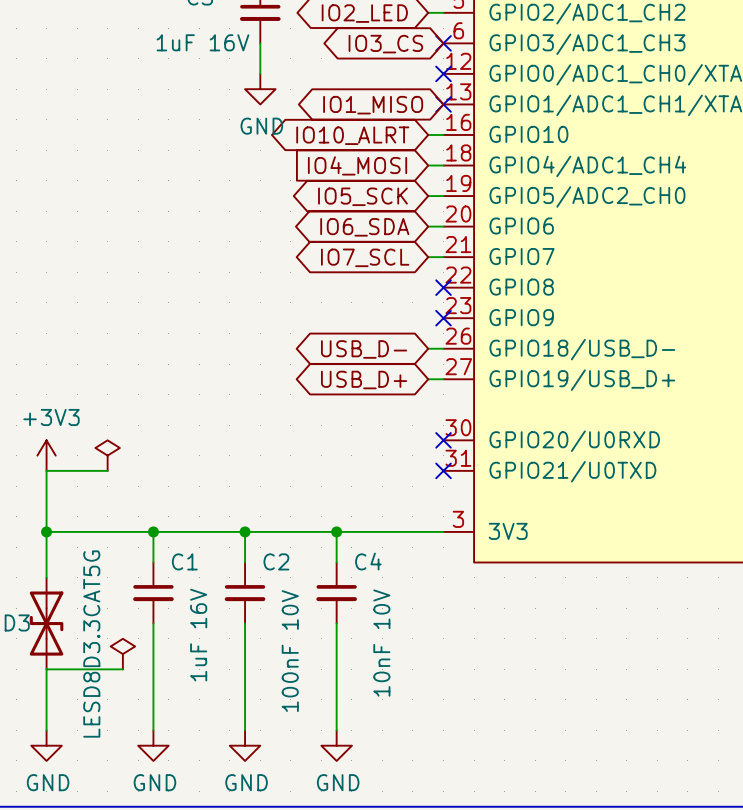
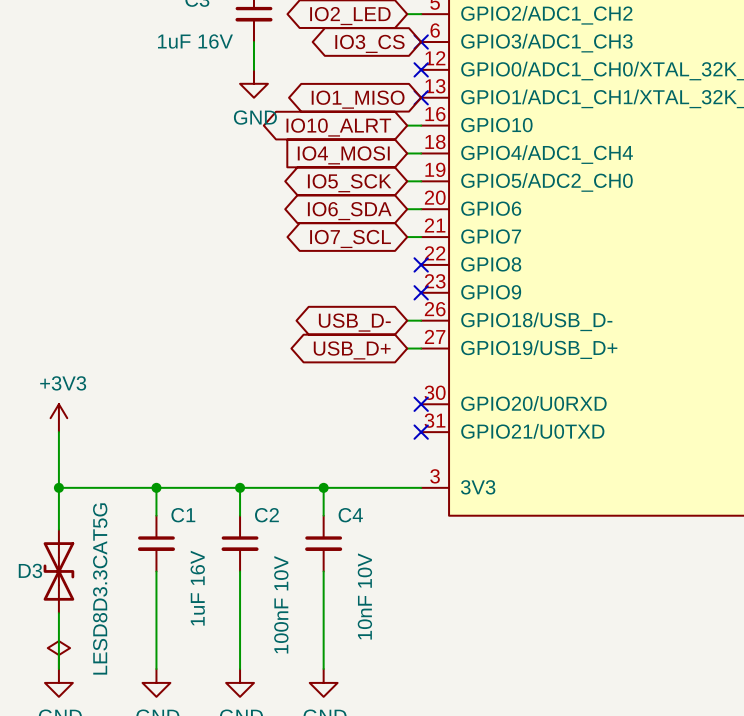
power symbol: (107, 455) -> none
wire: (46, 470) (107, 470) -> none
power symbol position: (122, 654) -> (58, 655)
wire: (46, 669) (122, 669) -> none

